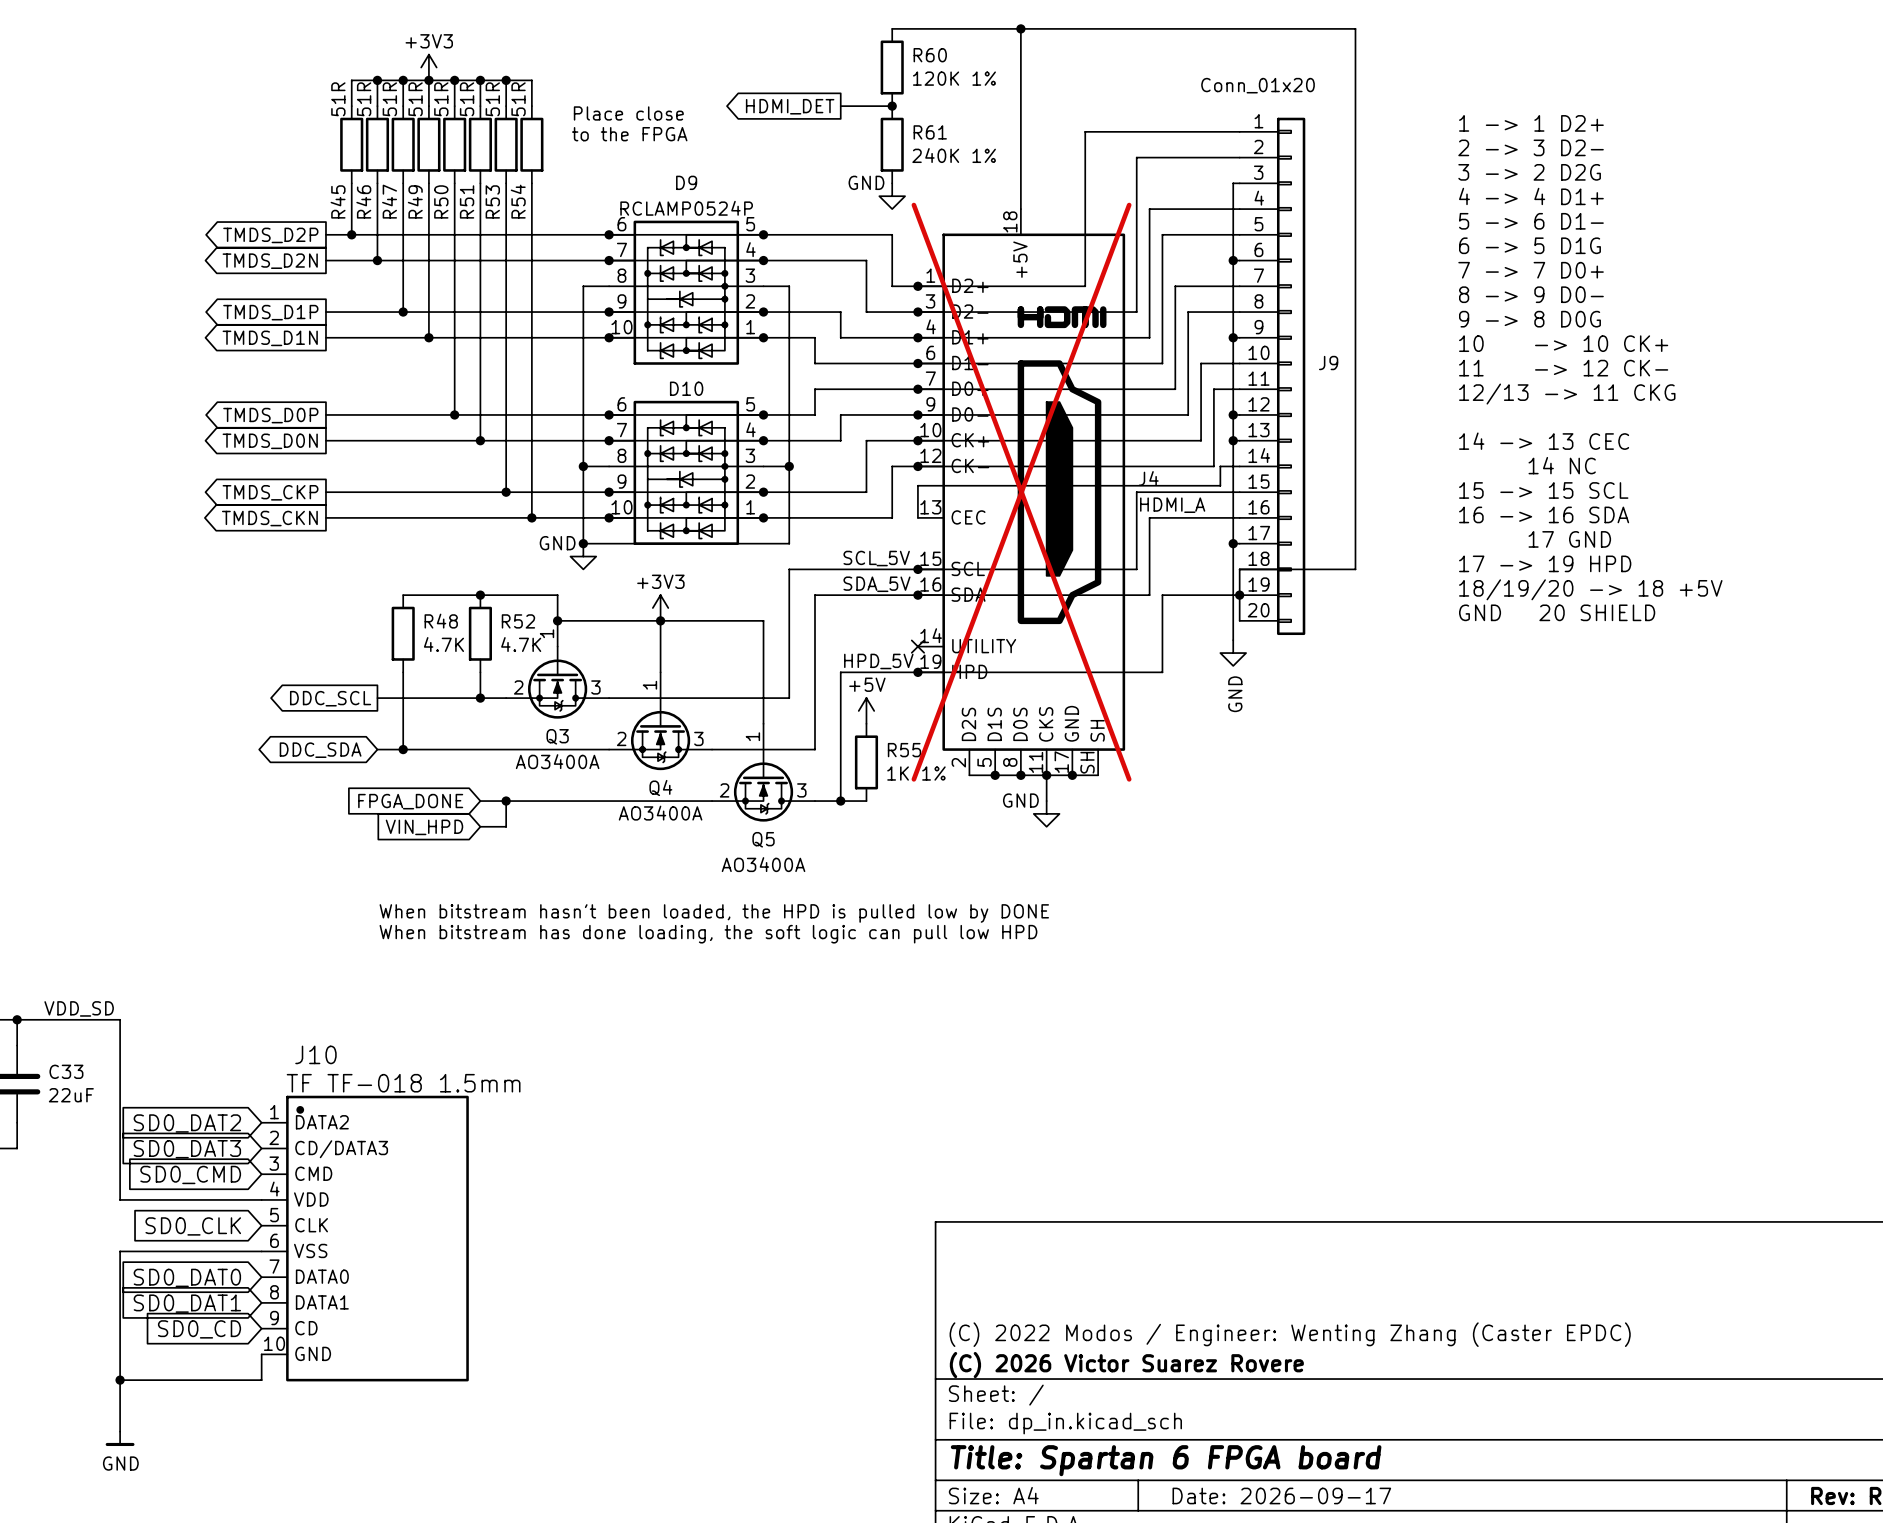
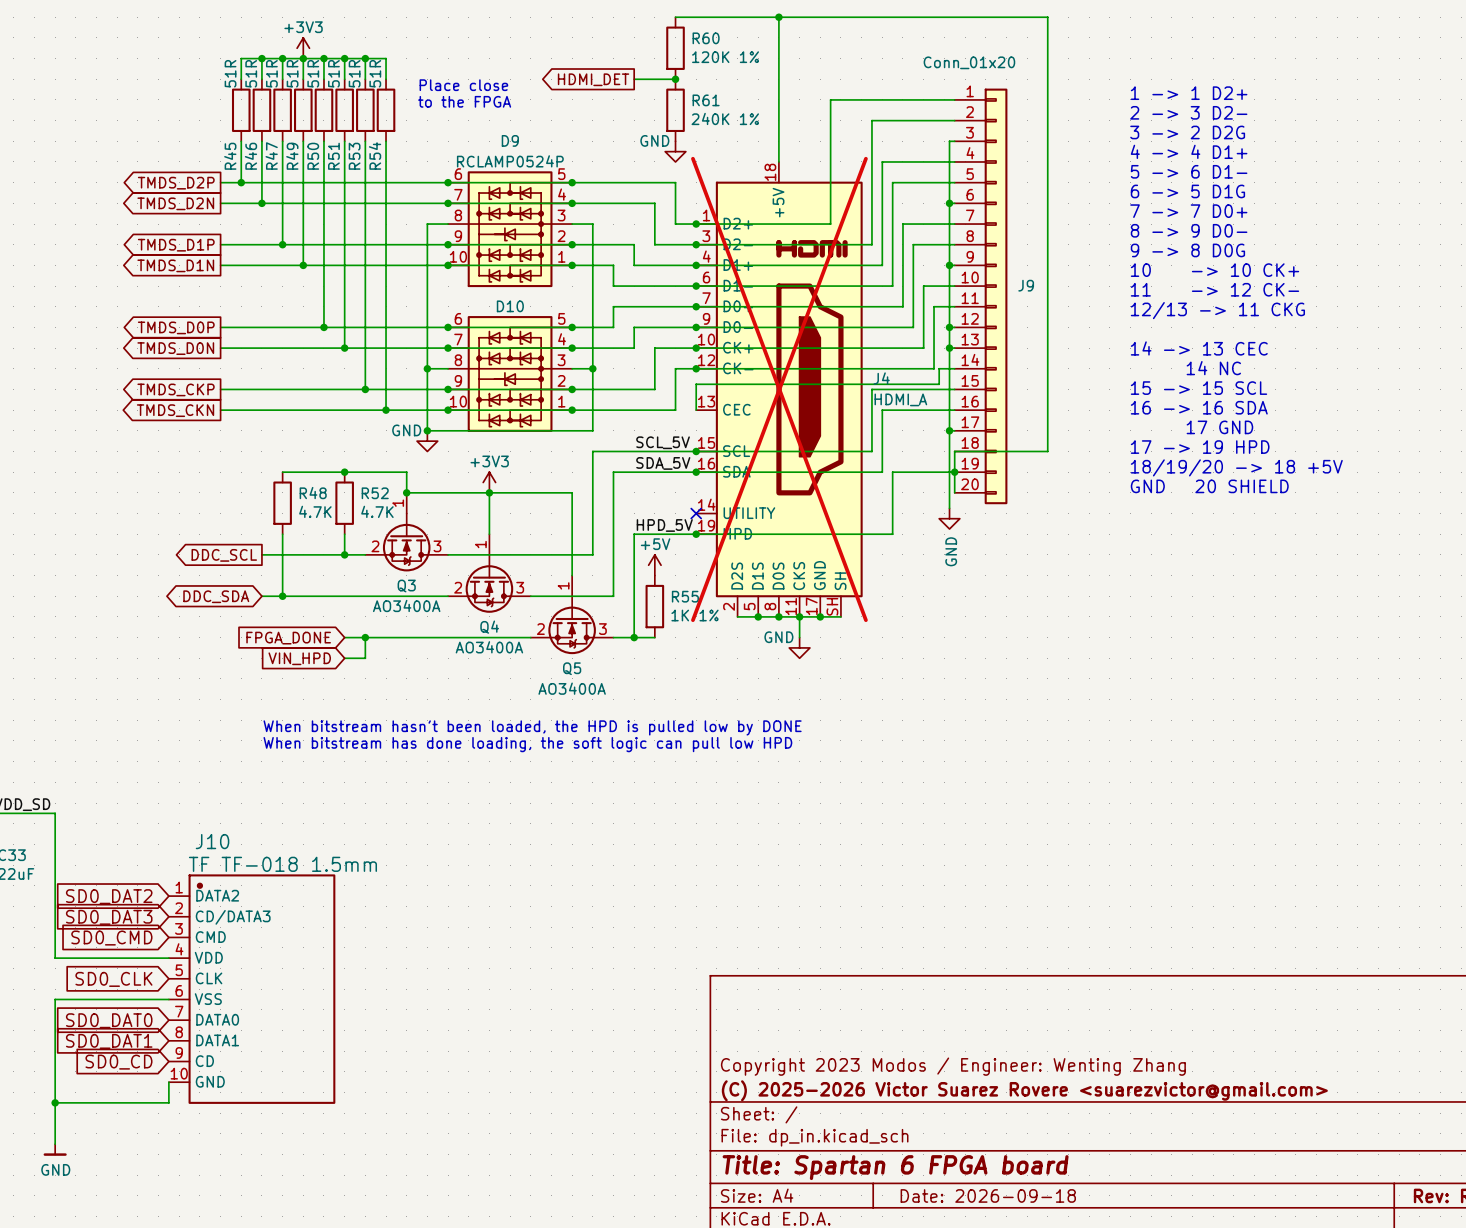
title block: (C) 2022 Modos / Engineer: Wenting Zhang (Caster EPDC) (1290, 1334) -> Copyright 2023 Modos / Engineer: Wenting Zhang (953, 1066)
title block: (C) 2026 Victor Suarez Rovere (1126, 1365) -> (C) 2025-2026 Victor Suarez Rovere <suarezvictor@gmail.com> (1024, 1090)
title block: Date: 2026-09-17 (1281, 1495) -> Date: 2026-09-18 (988, 1195)

